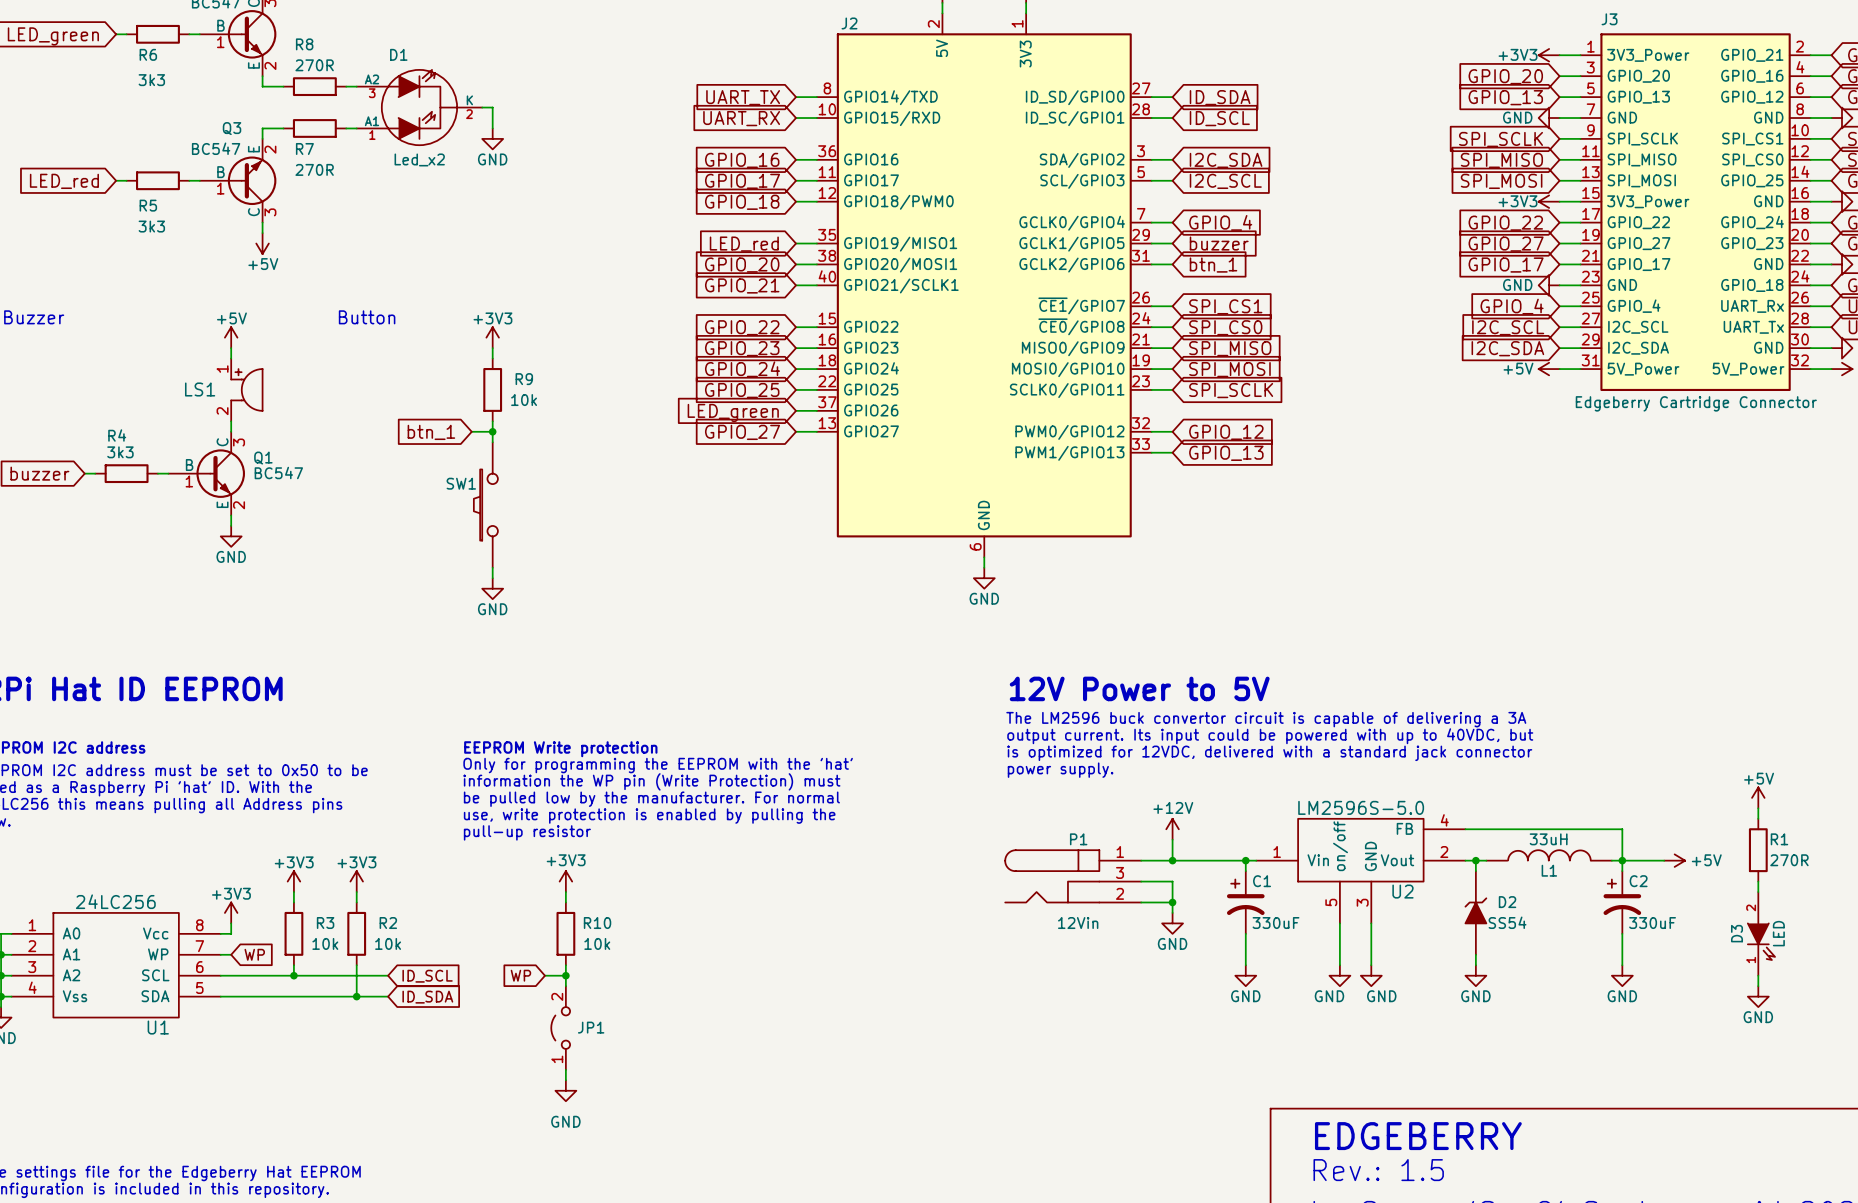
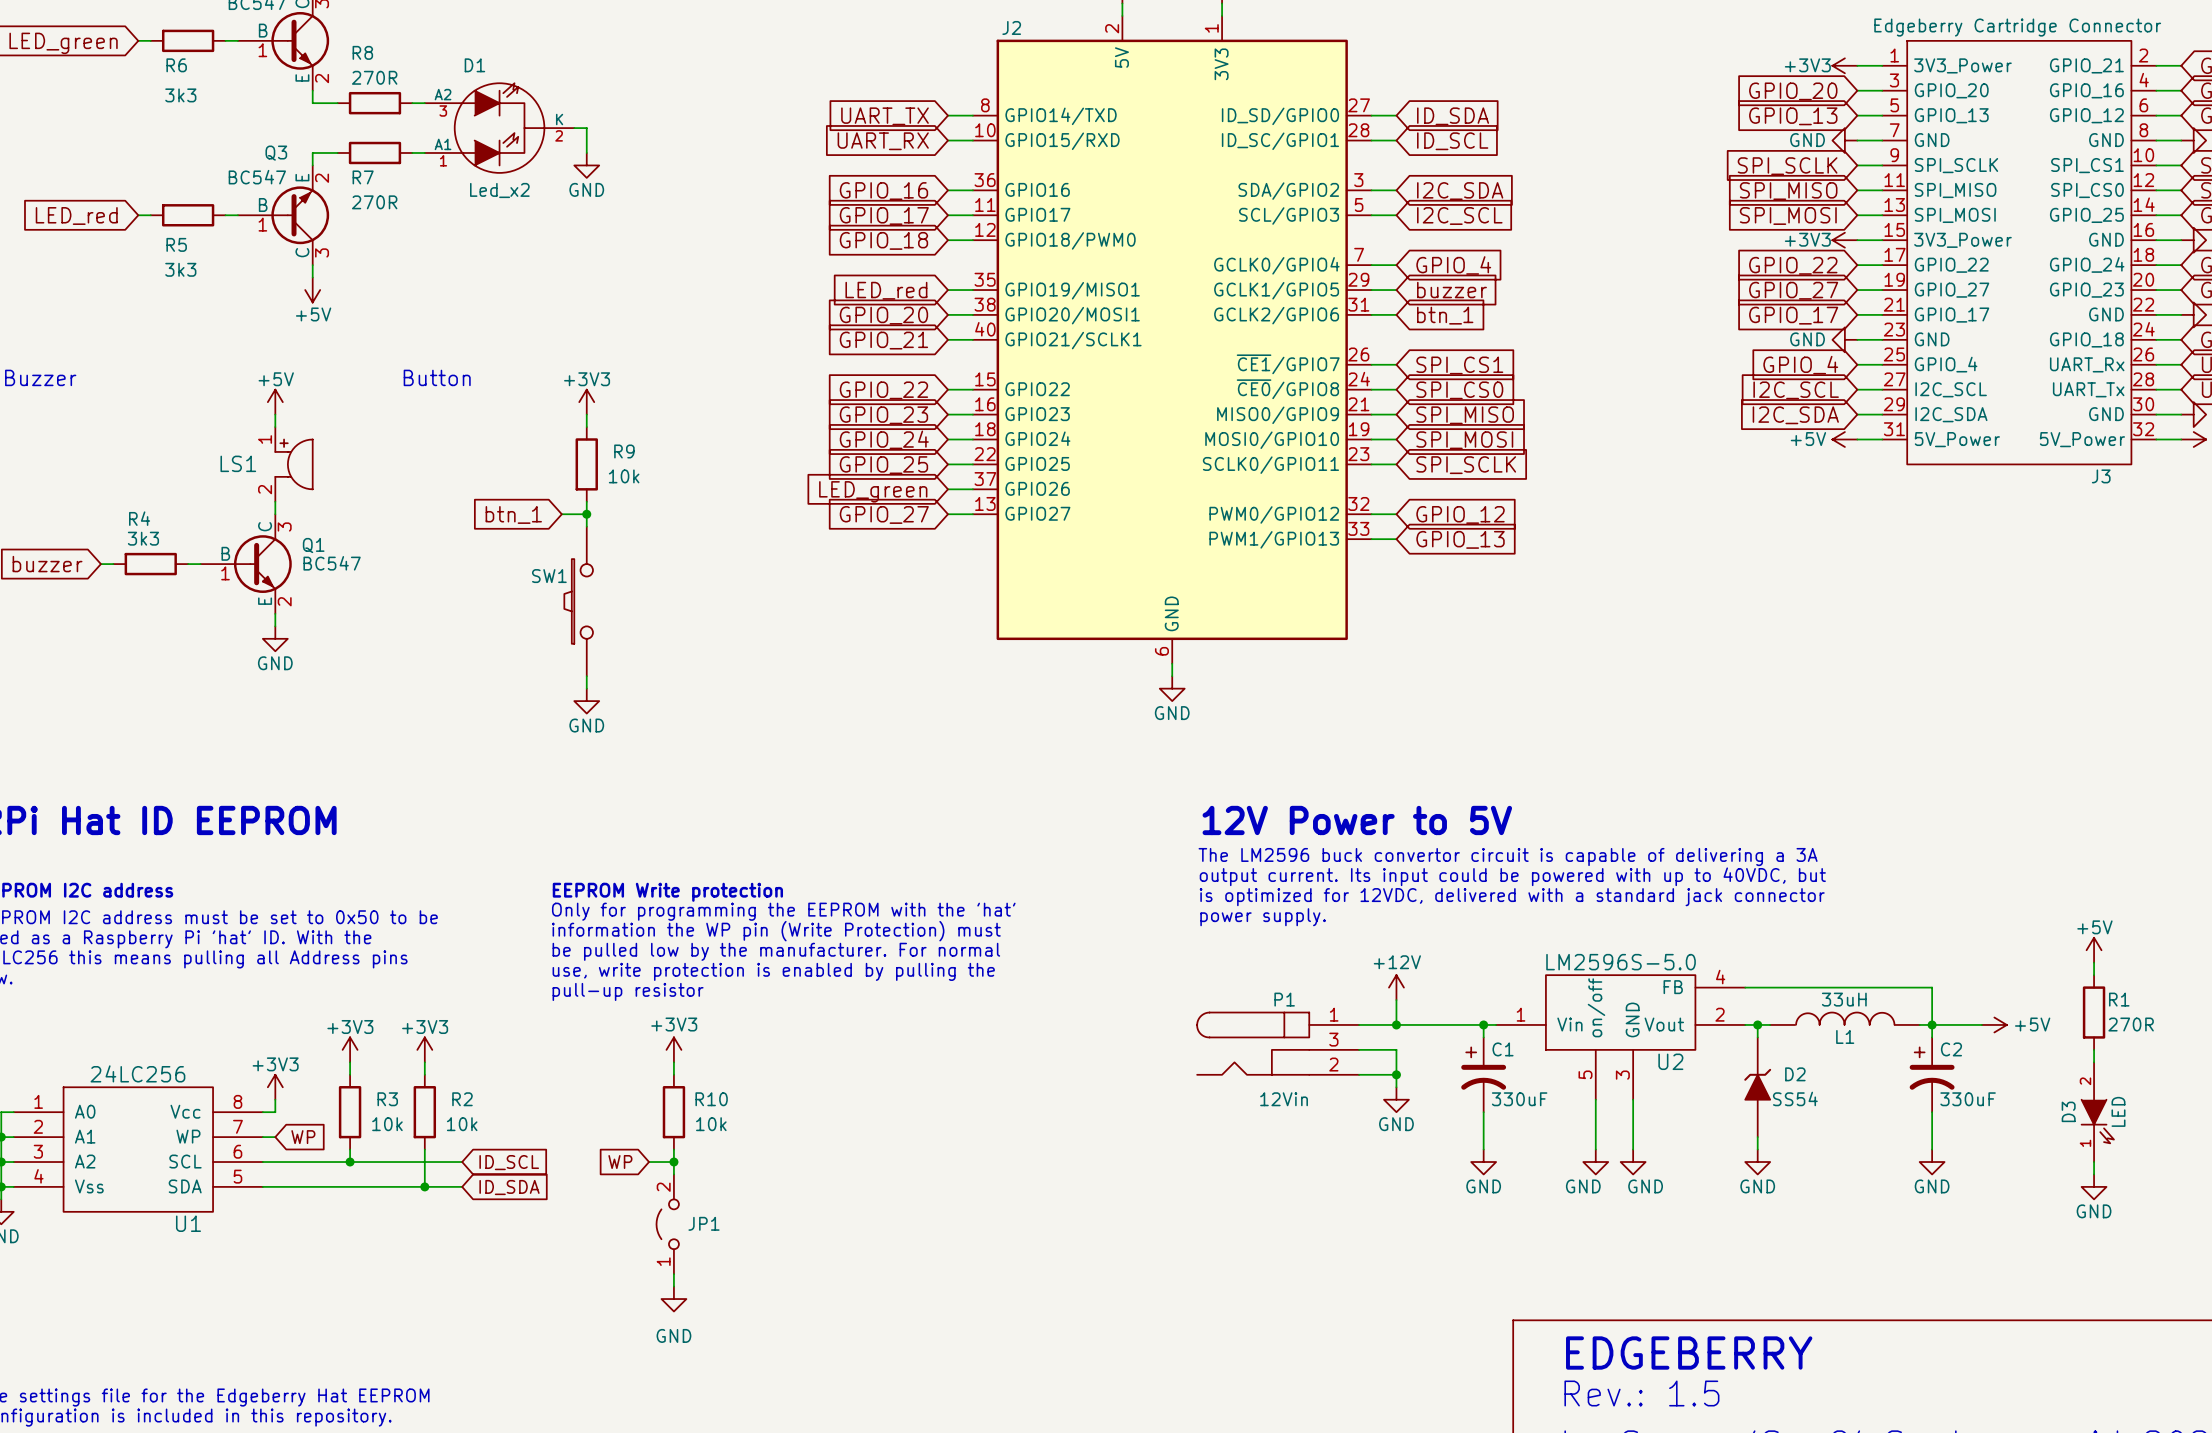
J3 name position: J3 (1609, 19) -> J3 (2101, 476)
J3 symbol: [1580, 33, 1811, 392] -> [1882, 40, 2157, 465]
J3 value position: Edgeberry Cartridge Connector (1696, 403) -> Edgeberry Cartridge Connector (2017, 27)

